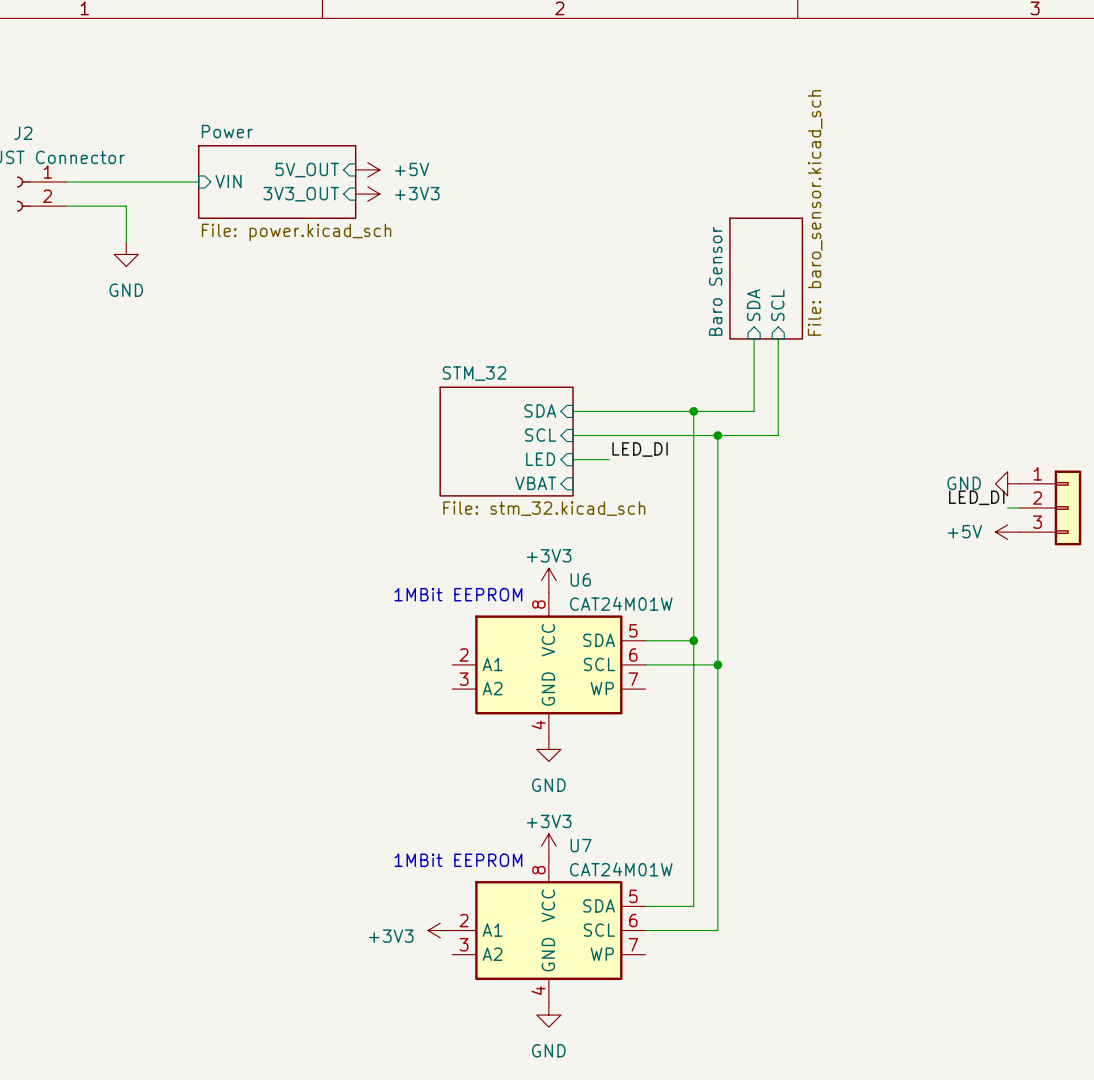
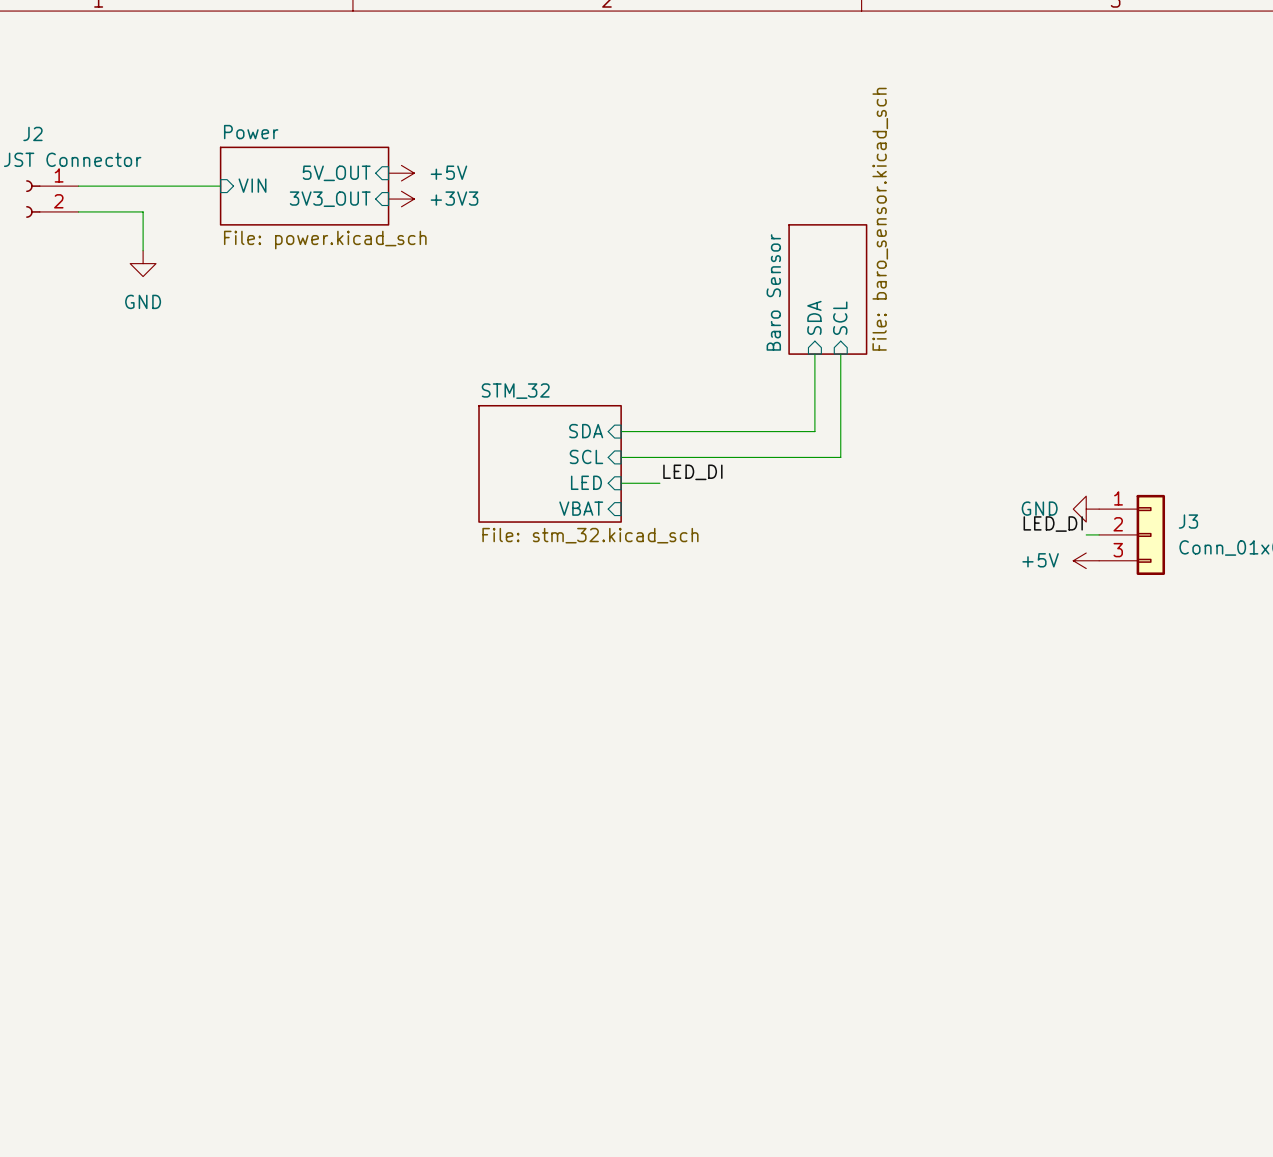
wire: (693, 411) (693, 906) (645, 906) -> none
junction: (693, 411) -> none
wire: (717, 435) (717, 930) (645, 930) -> none
junction: (717, 435) -> none
power symbol: +3V3 (548, 580) -> none
text: 1MBit EEPROM (458, 594) -> none
wire: (645, 640) (693, 640) -> none
junction: (693, 640) -> none
U6: CAT24M01W (548, 664) -> none
wire: (645, 664) (717, 664) -> none
junction: (717, 664) -> none
power symbol: GND (548, 749) -> none
power symbol: +3V3 (548, 846) -> none
text: 1MBit EEPROM (458, 860) -> none
power symbol: +3V3 (440, 930) -> none
U7: CAT24M01W (548, 930) -> none
power symbol: GND (548, 1015) -> none

